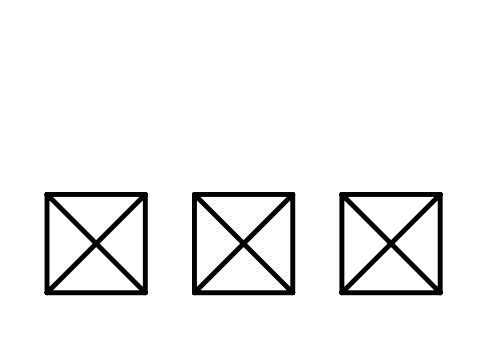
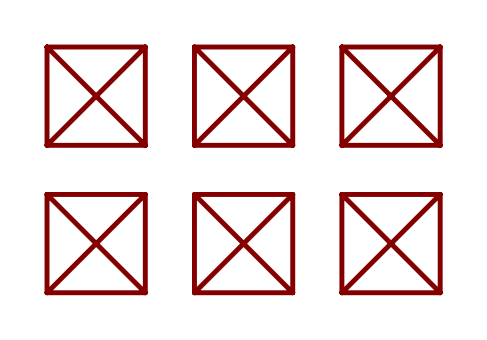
part: none -> (96, 96)
part: none -> (243, 96)
part: none -> (391, 96)

